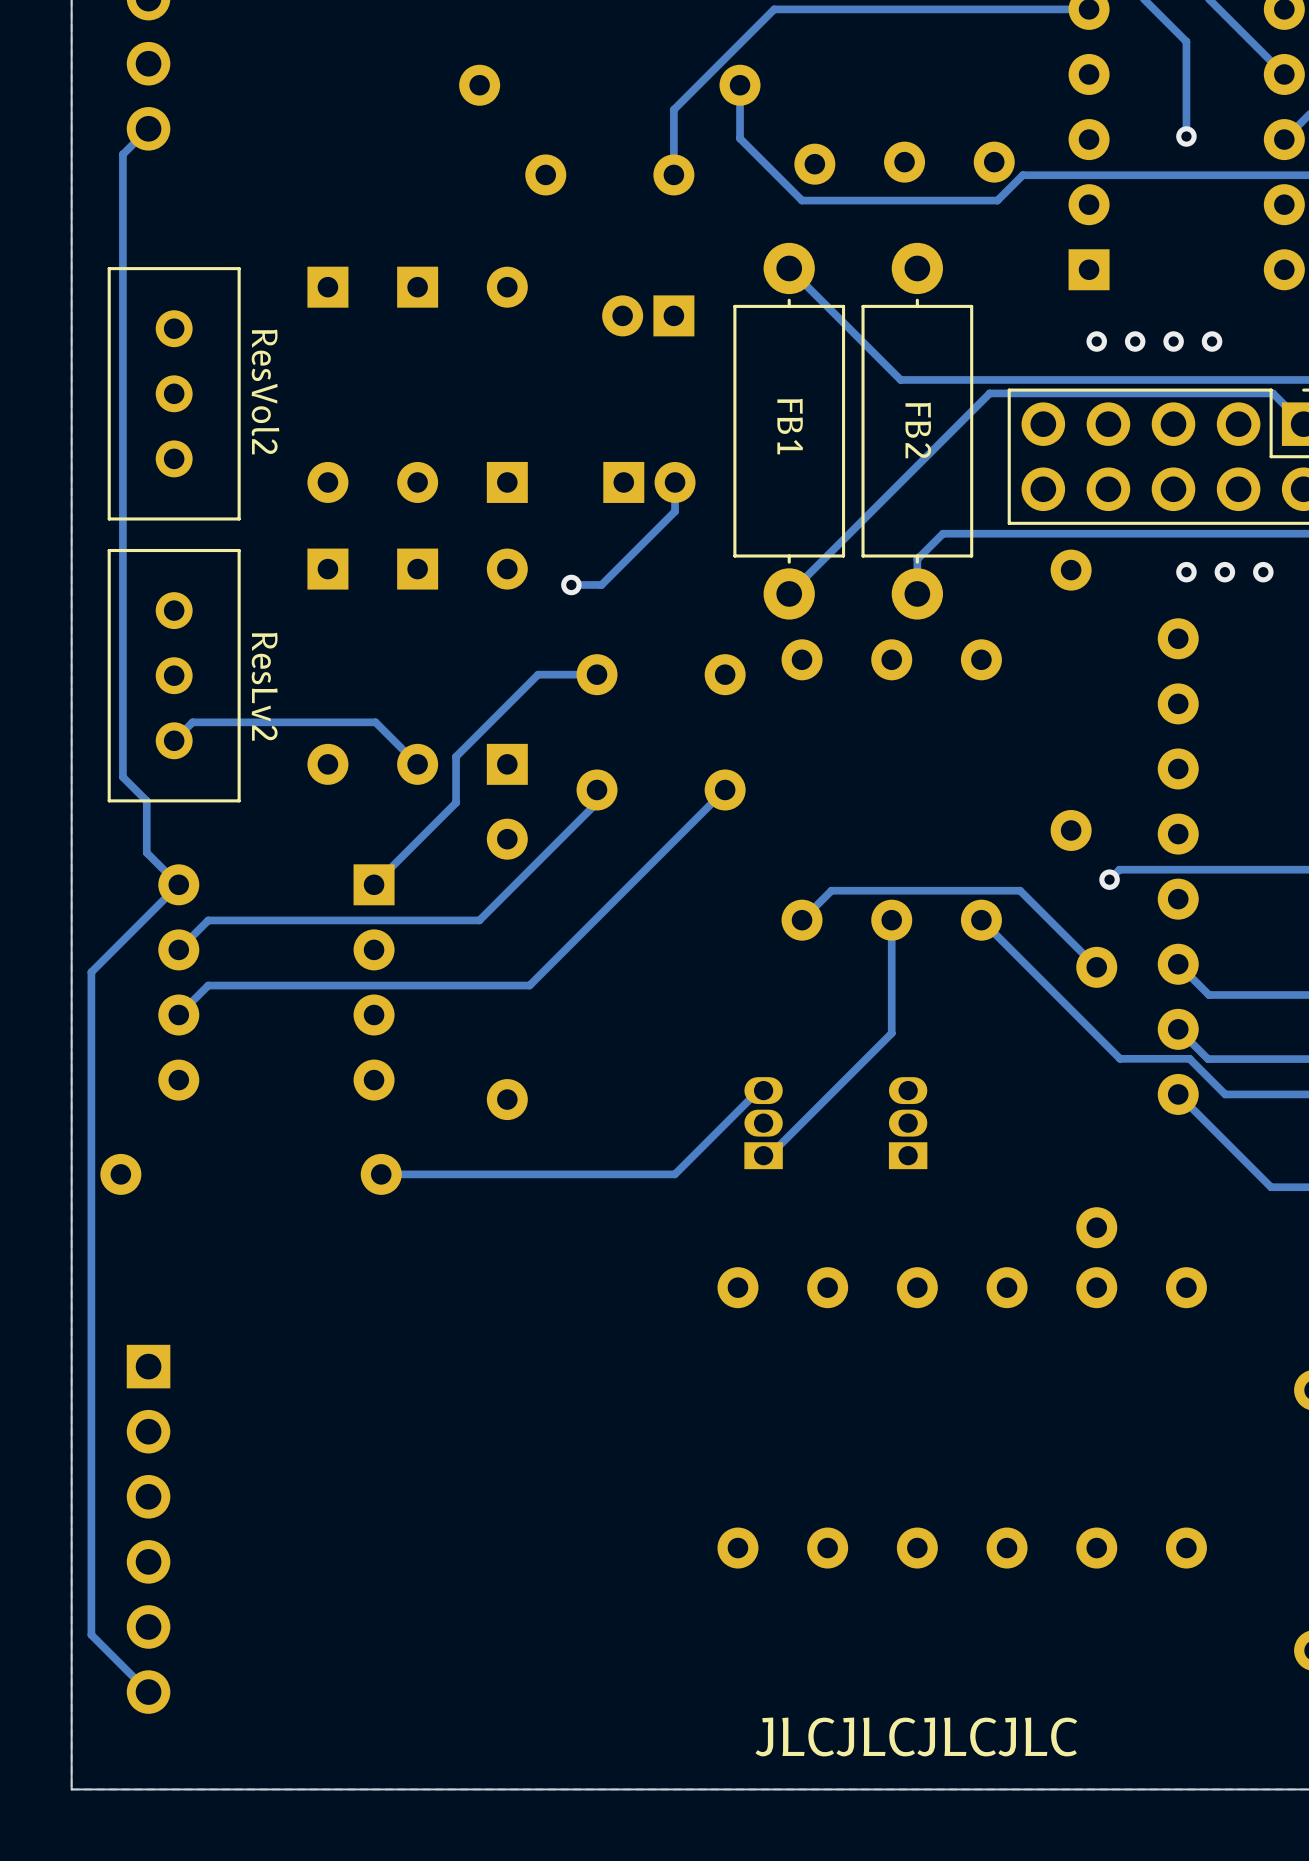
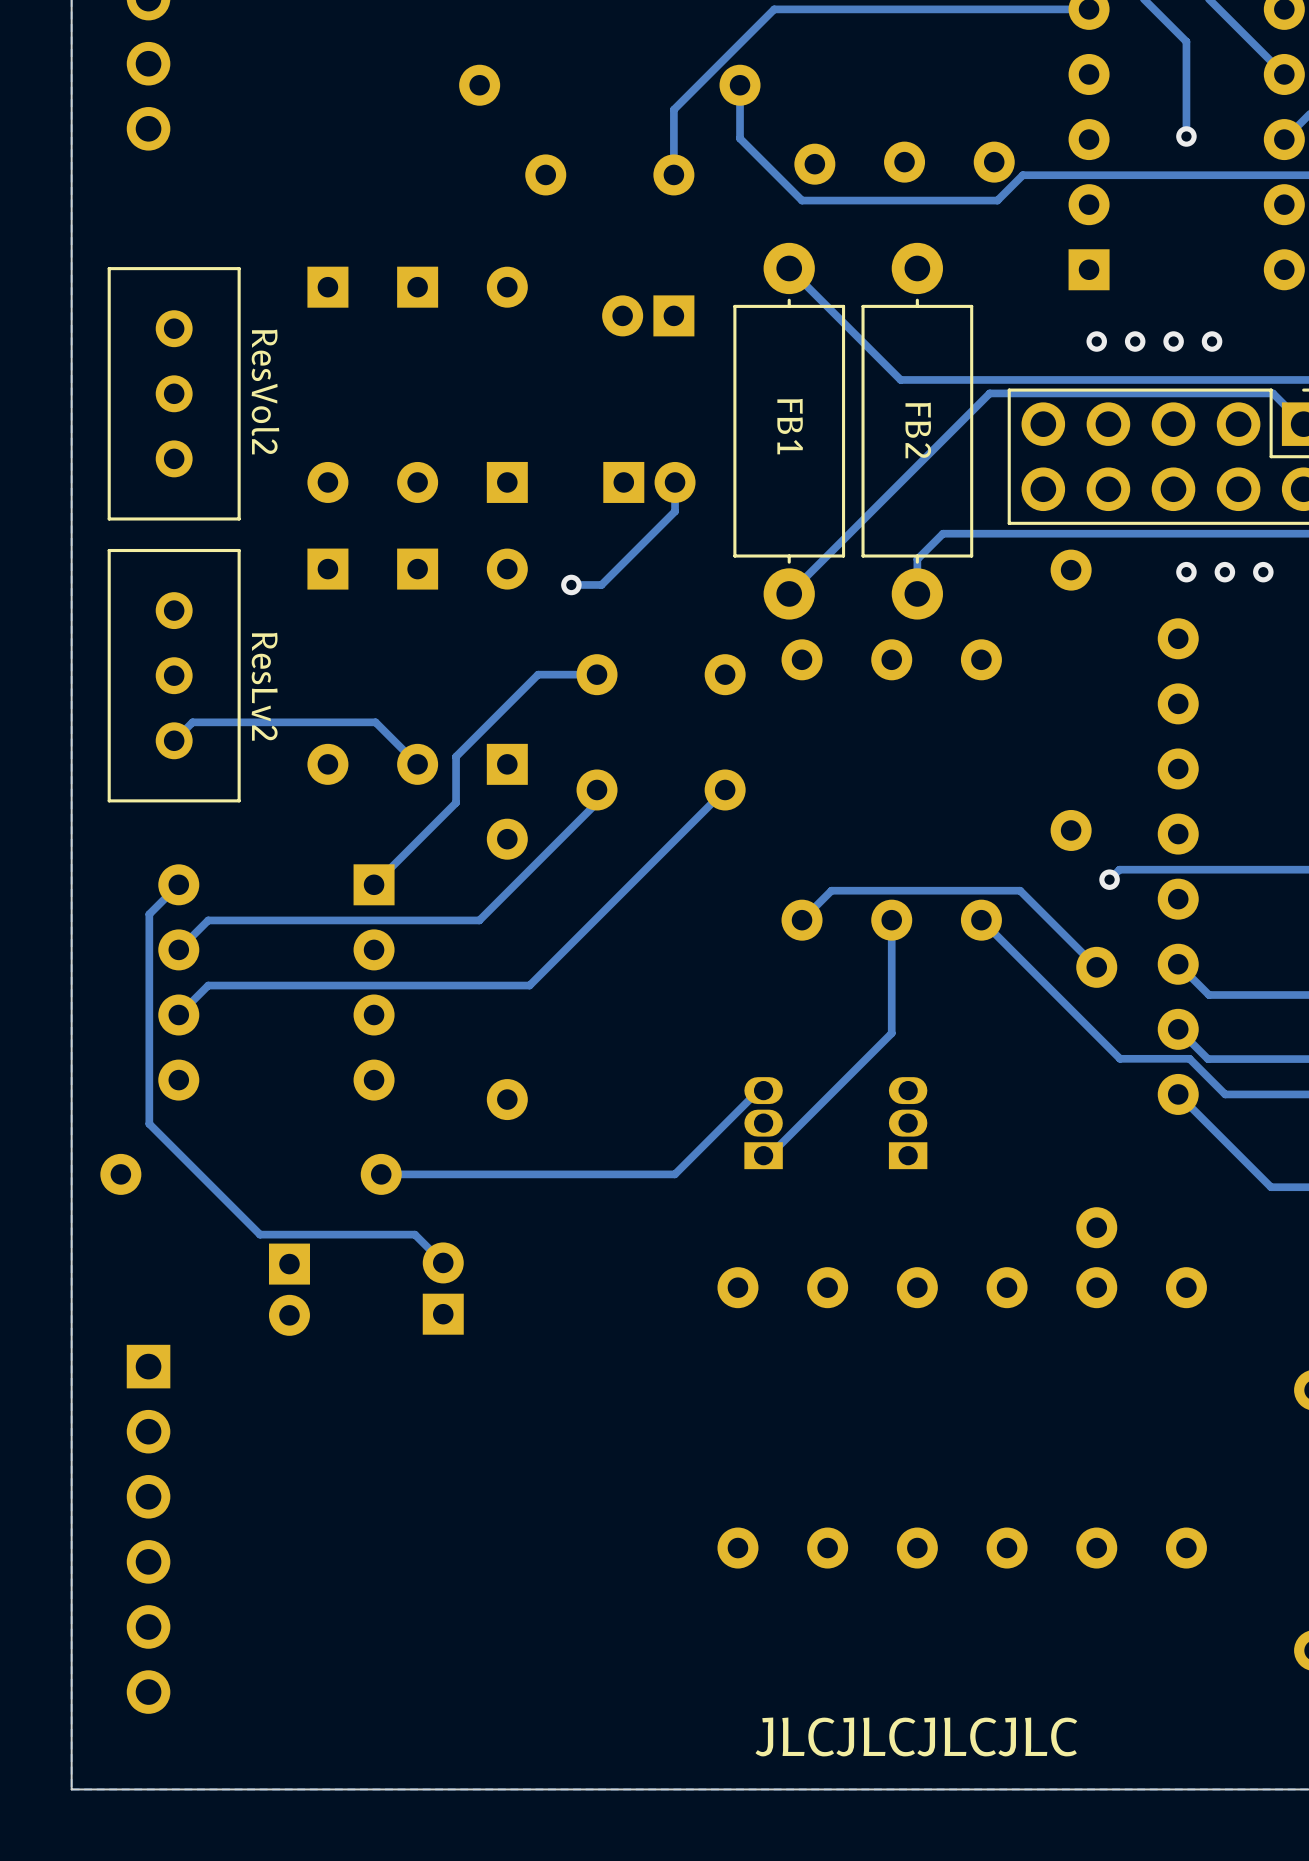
track: (148, 128) (122, 154) (122, 777) (146, 801) (146, 852) (178, 884) -> none
track: (149, 914) (91, 972) (91, 1634) (148, 1692) -> (149, 914) (149, 1123) (260, 1234) (414, 1234) (443, 1262)
part: none -> (443, 1288)
part: none -> (289, 1289)

